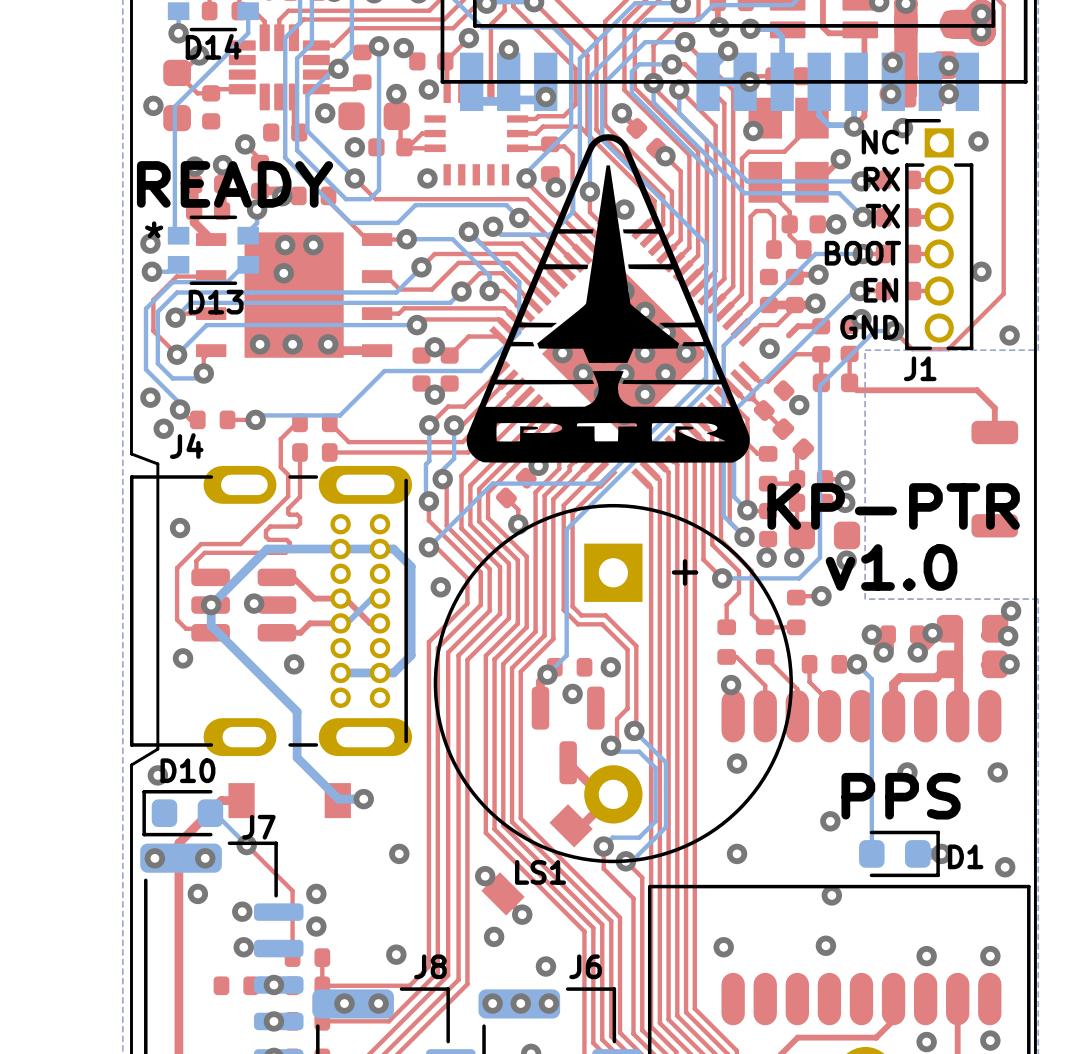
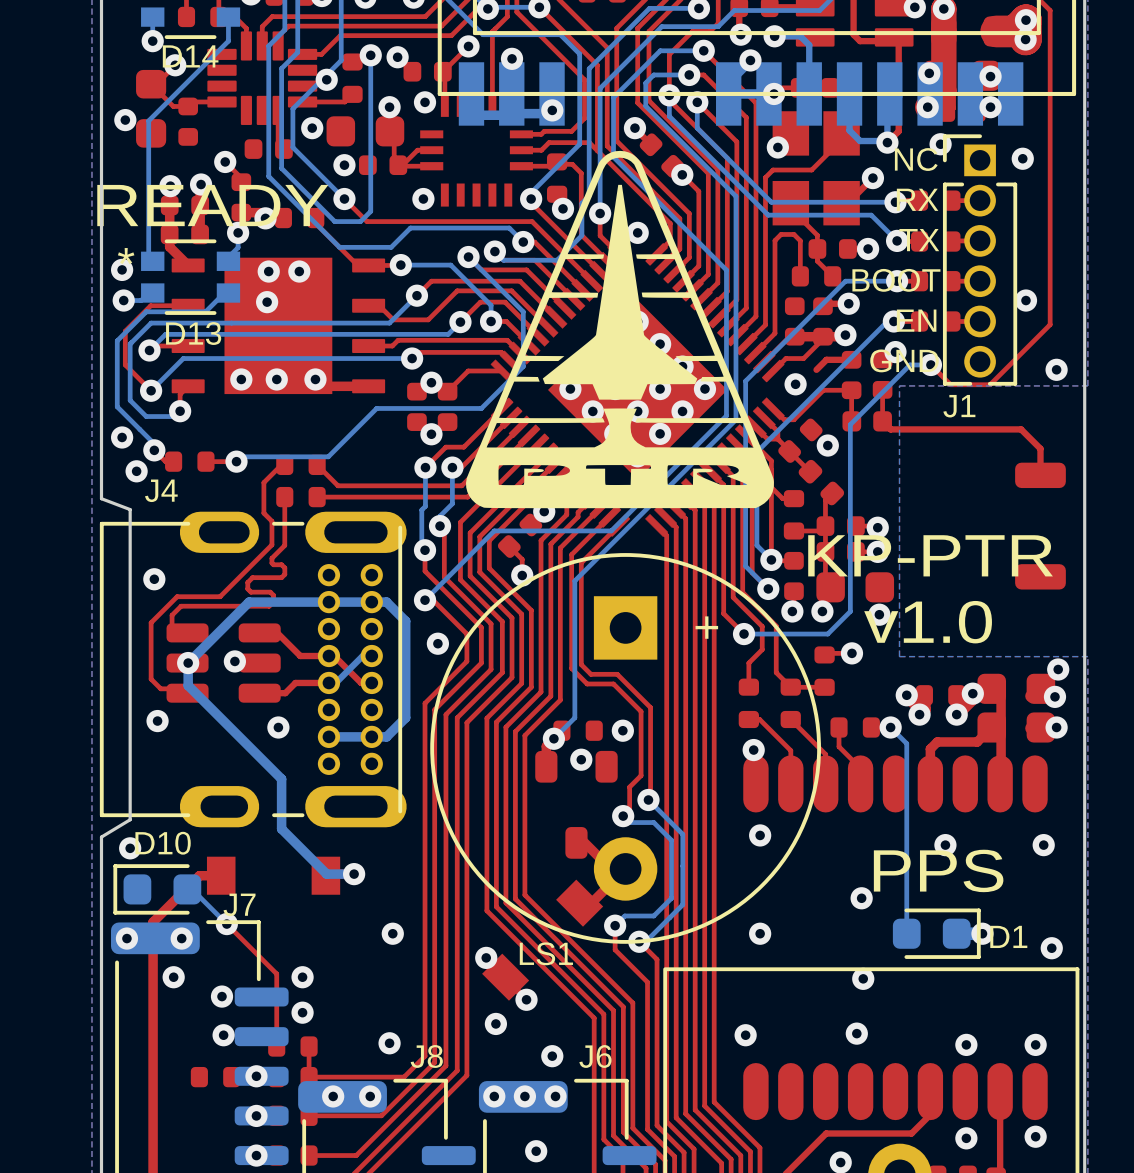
part footprint: [531, 686, 605, 785] -> [535, 750, 618, 859]

